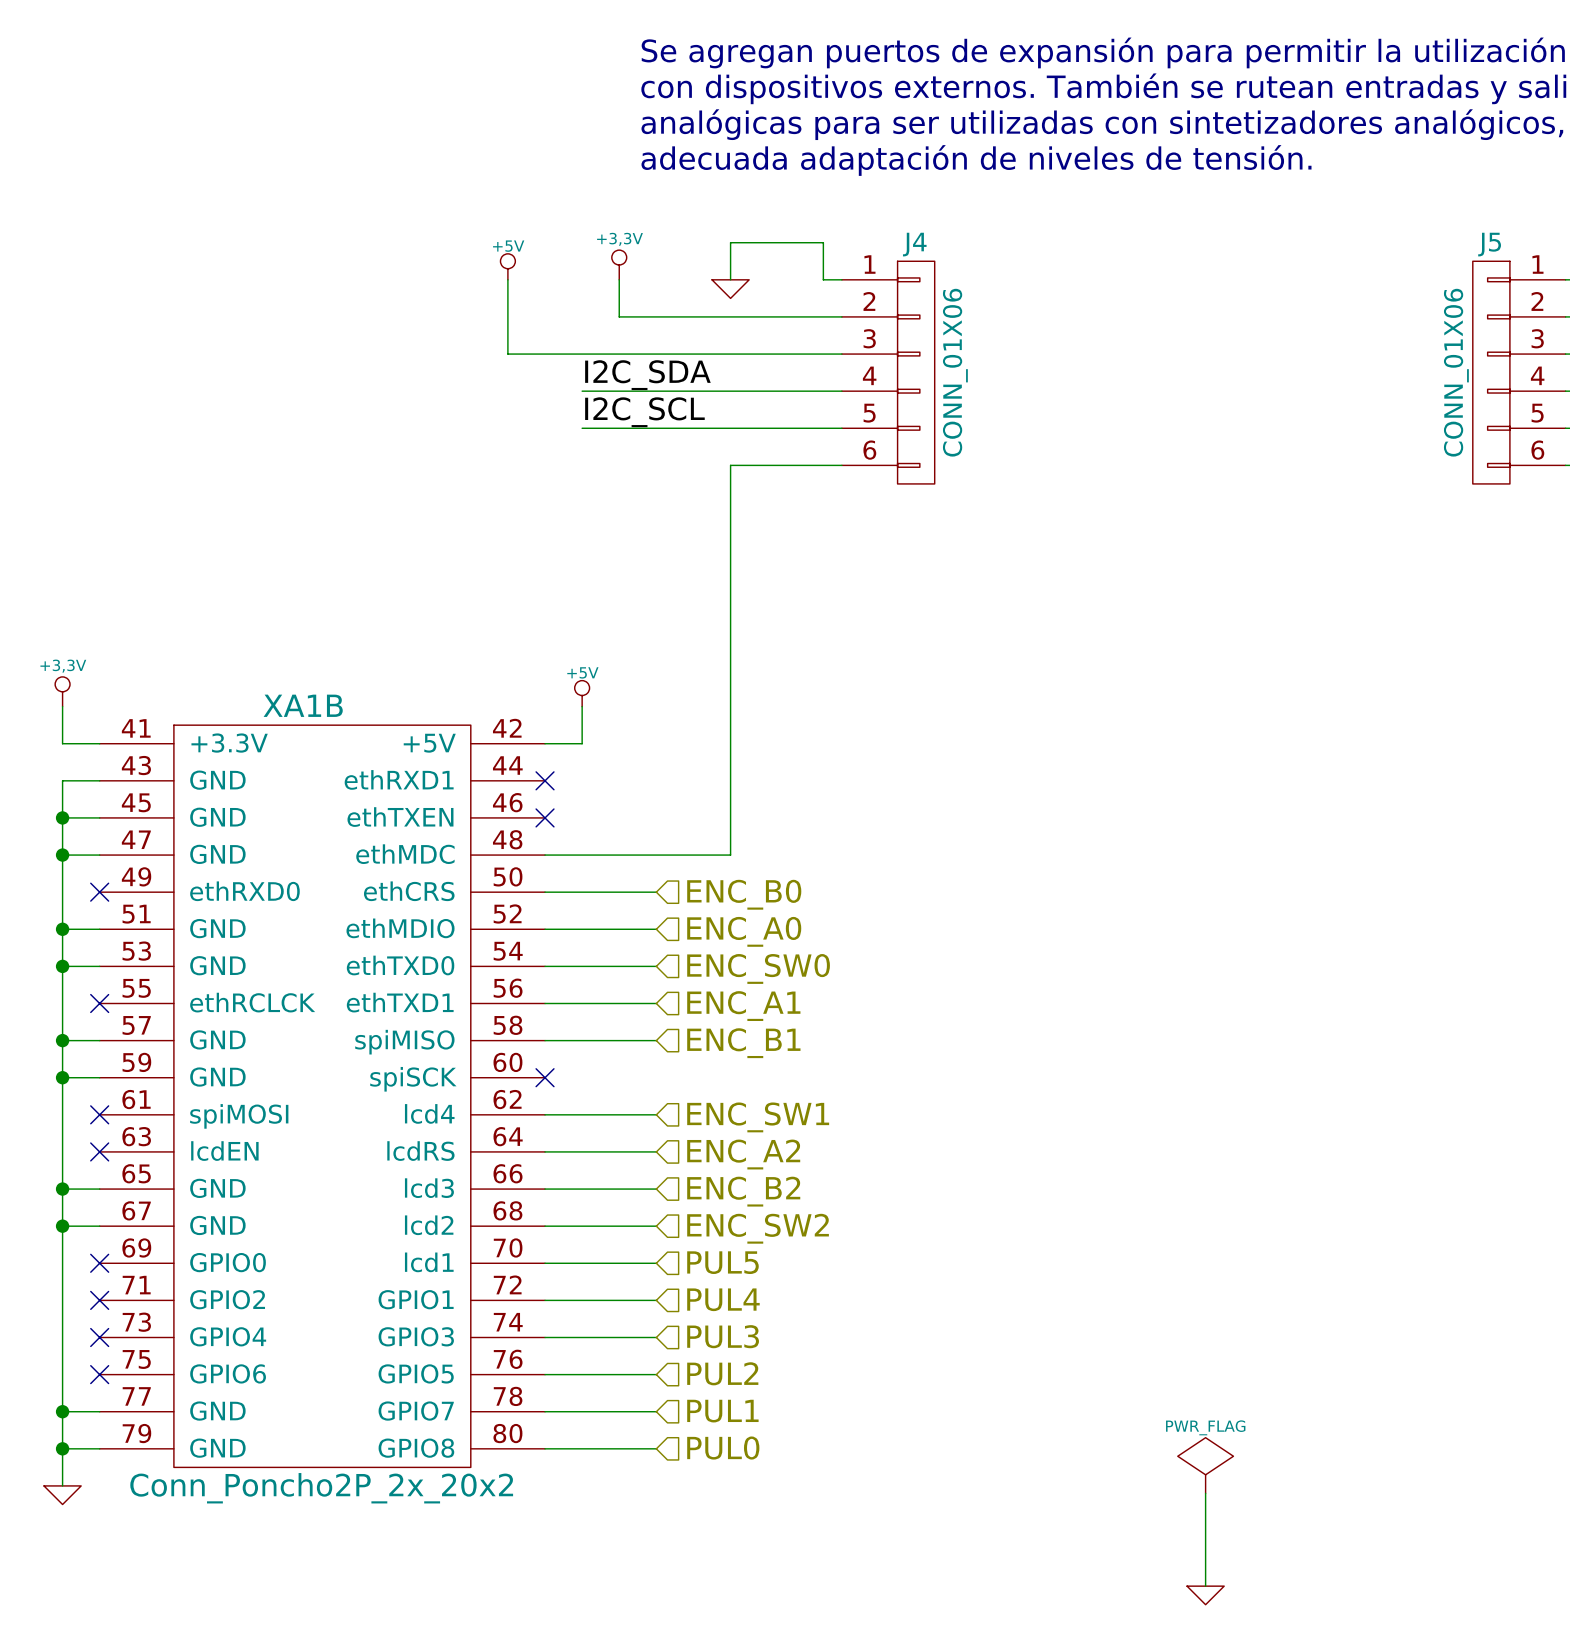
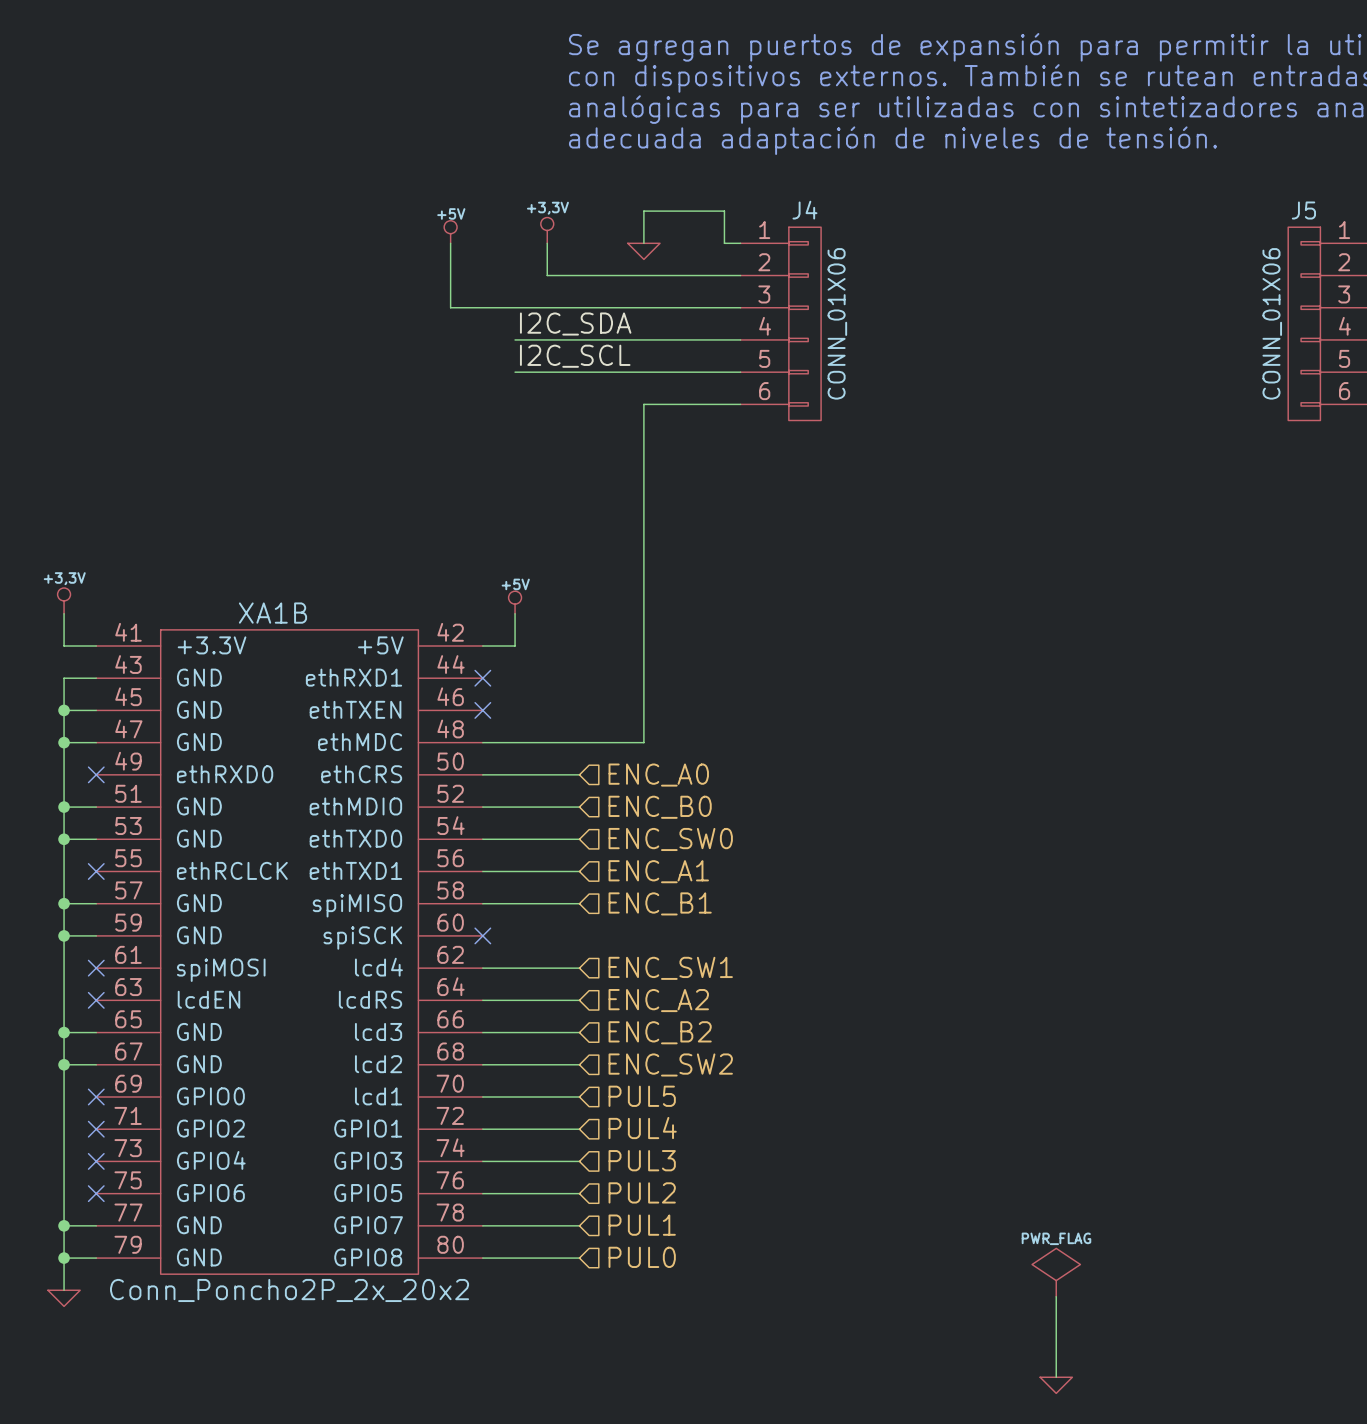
hierarchical label: ENC_B0 (744, 894) -> ENC_A0 (658, 775)
hierarchical label: ENC_A0 (744, 931) -> ENC_B0 (660, 807)

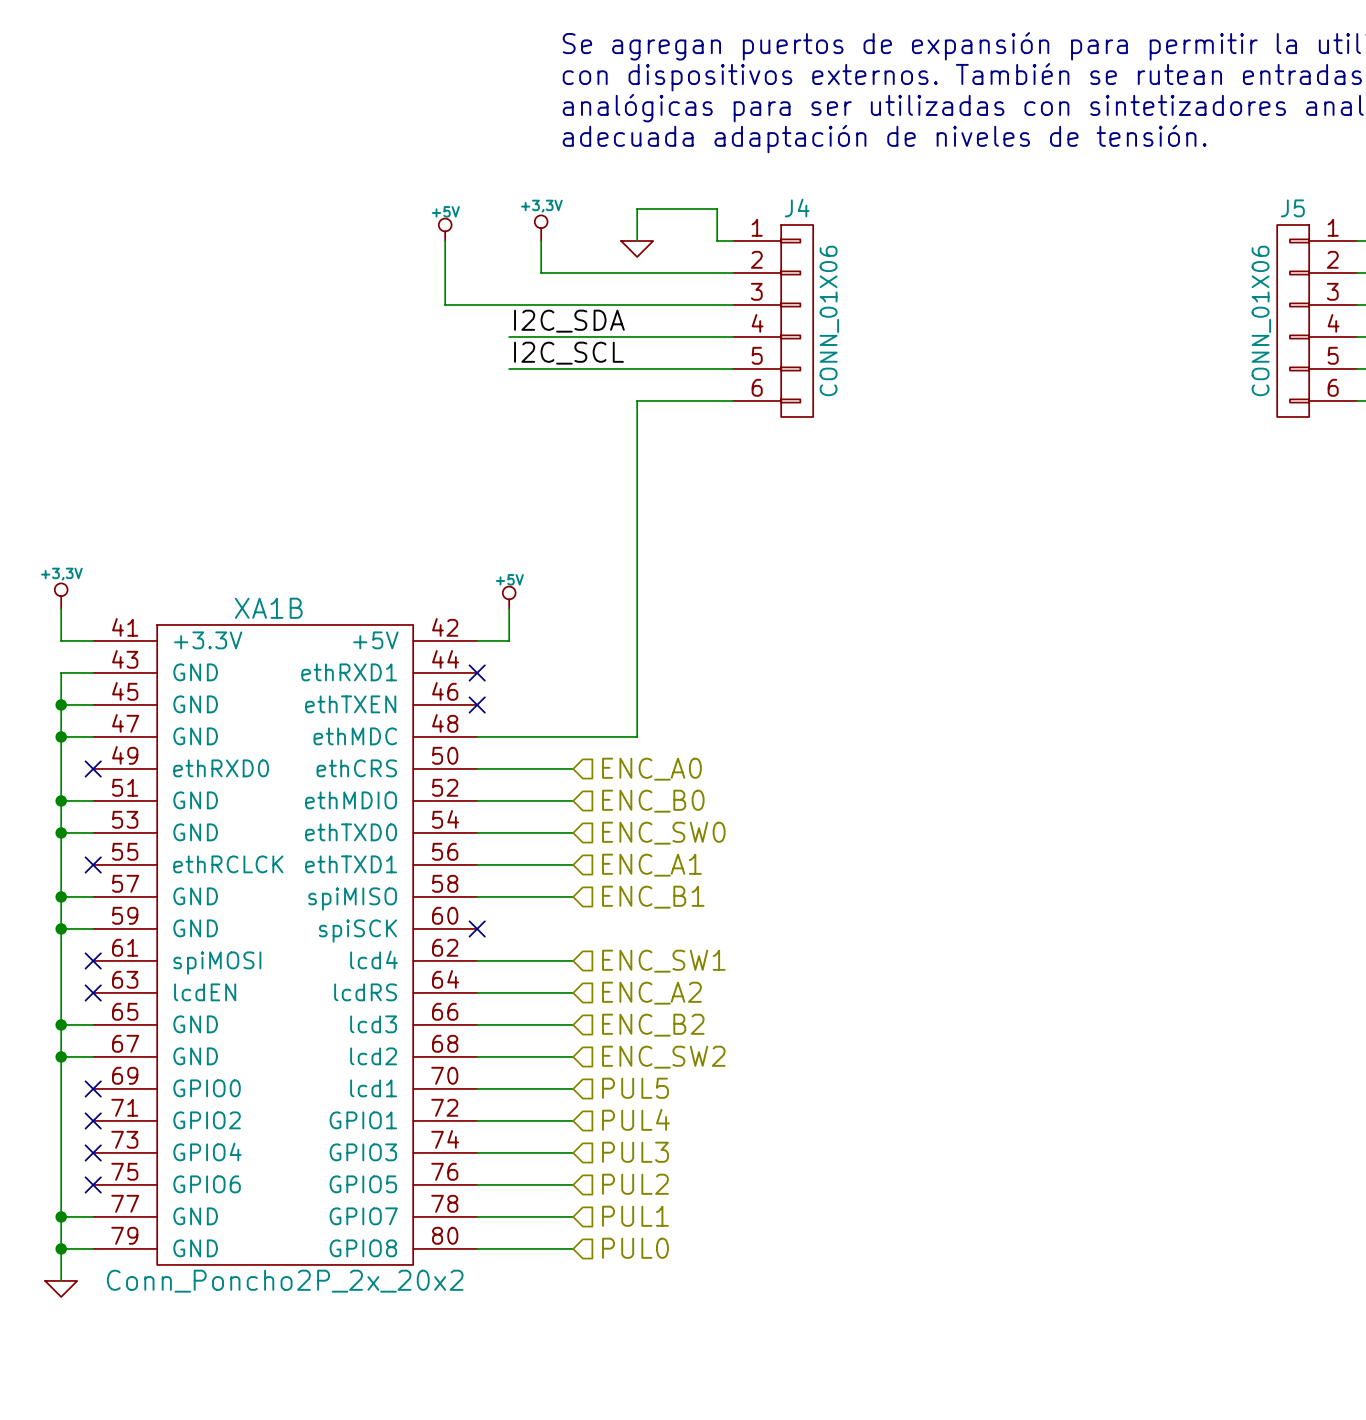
power symbol: PWR_FLAG (1056, 1272) -> none
wire: (1056, 1296) (1056, 1377) -> none
power symbol: (1056, 1385) -> none

